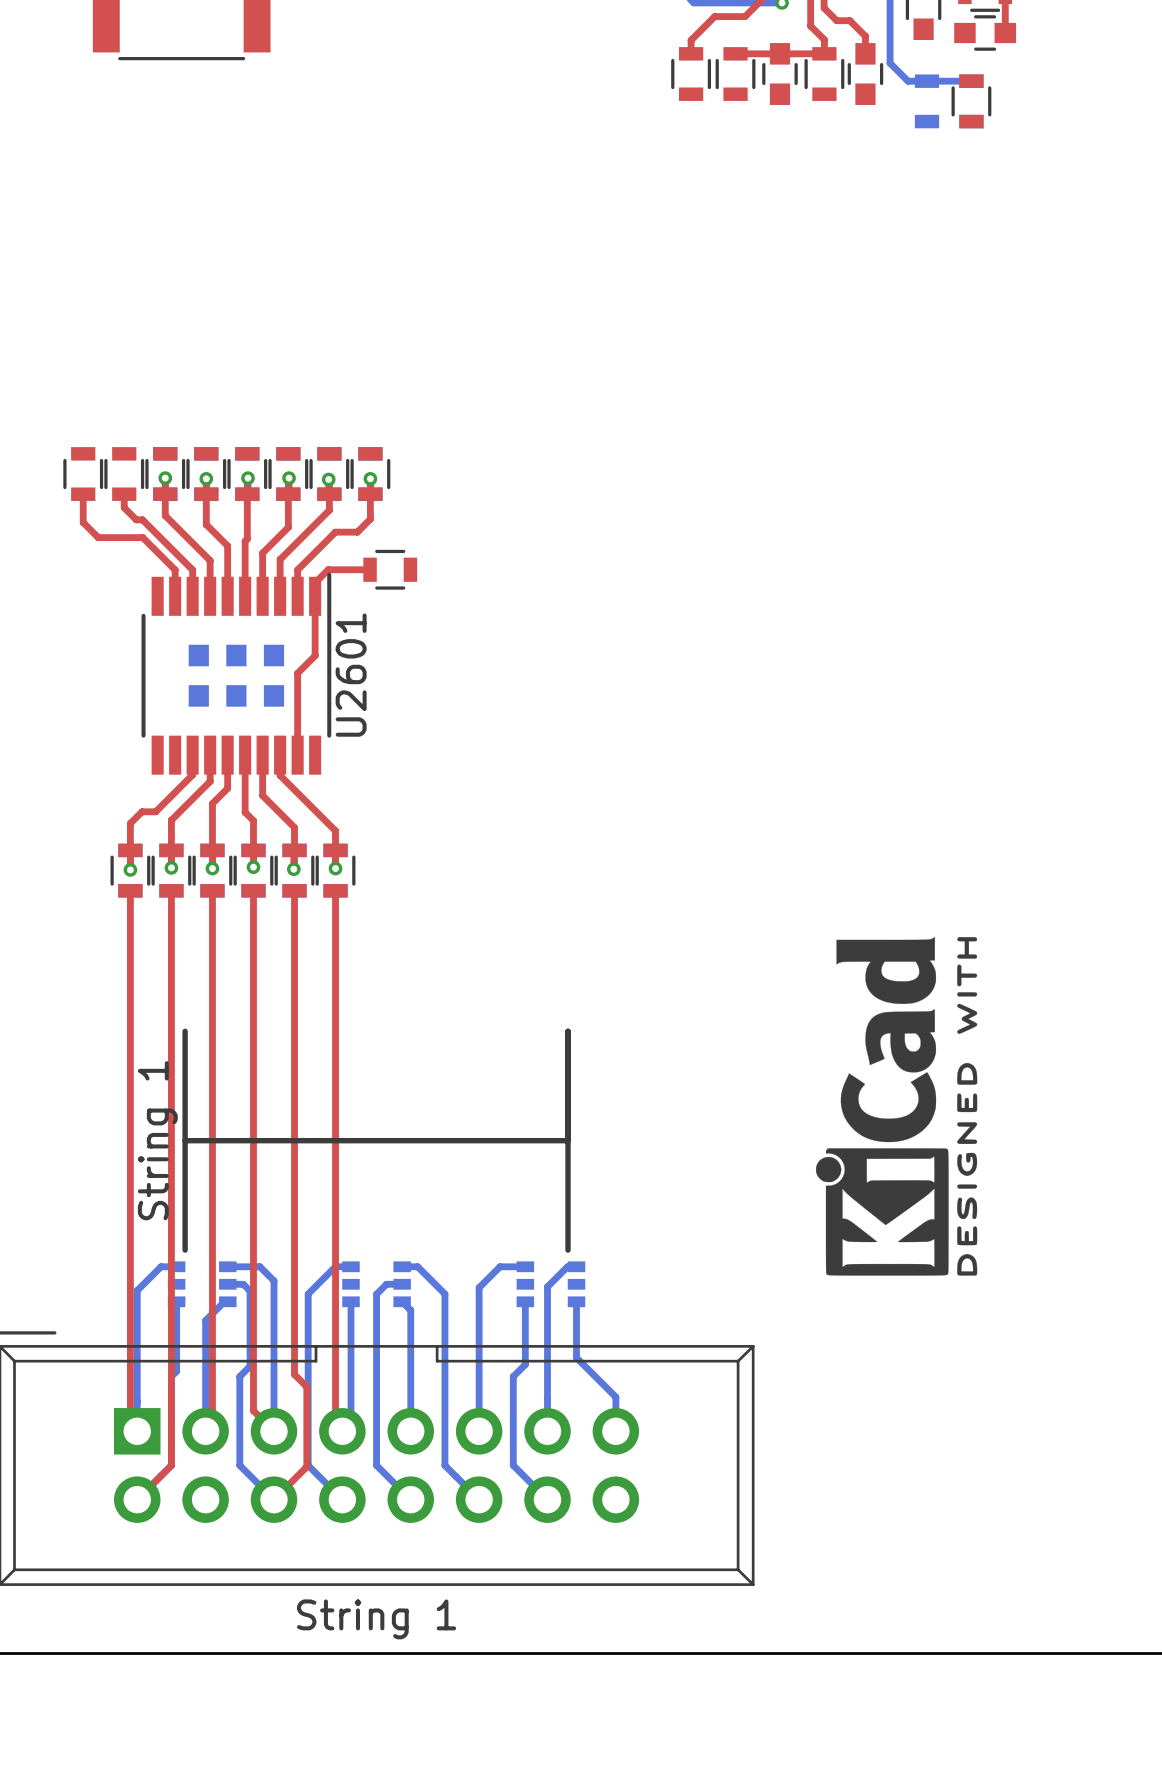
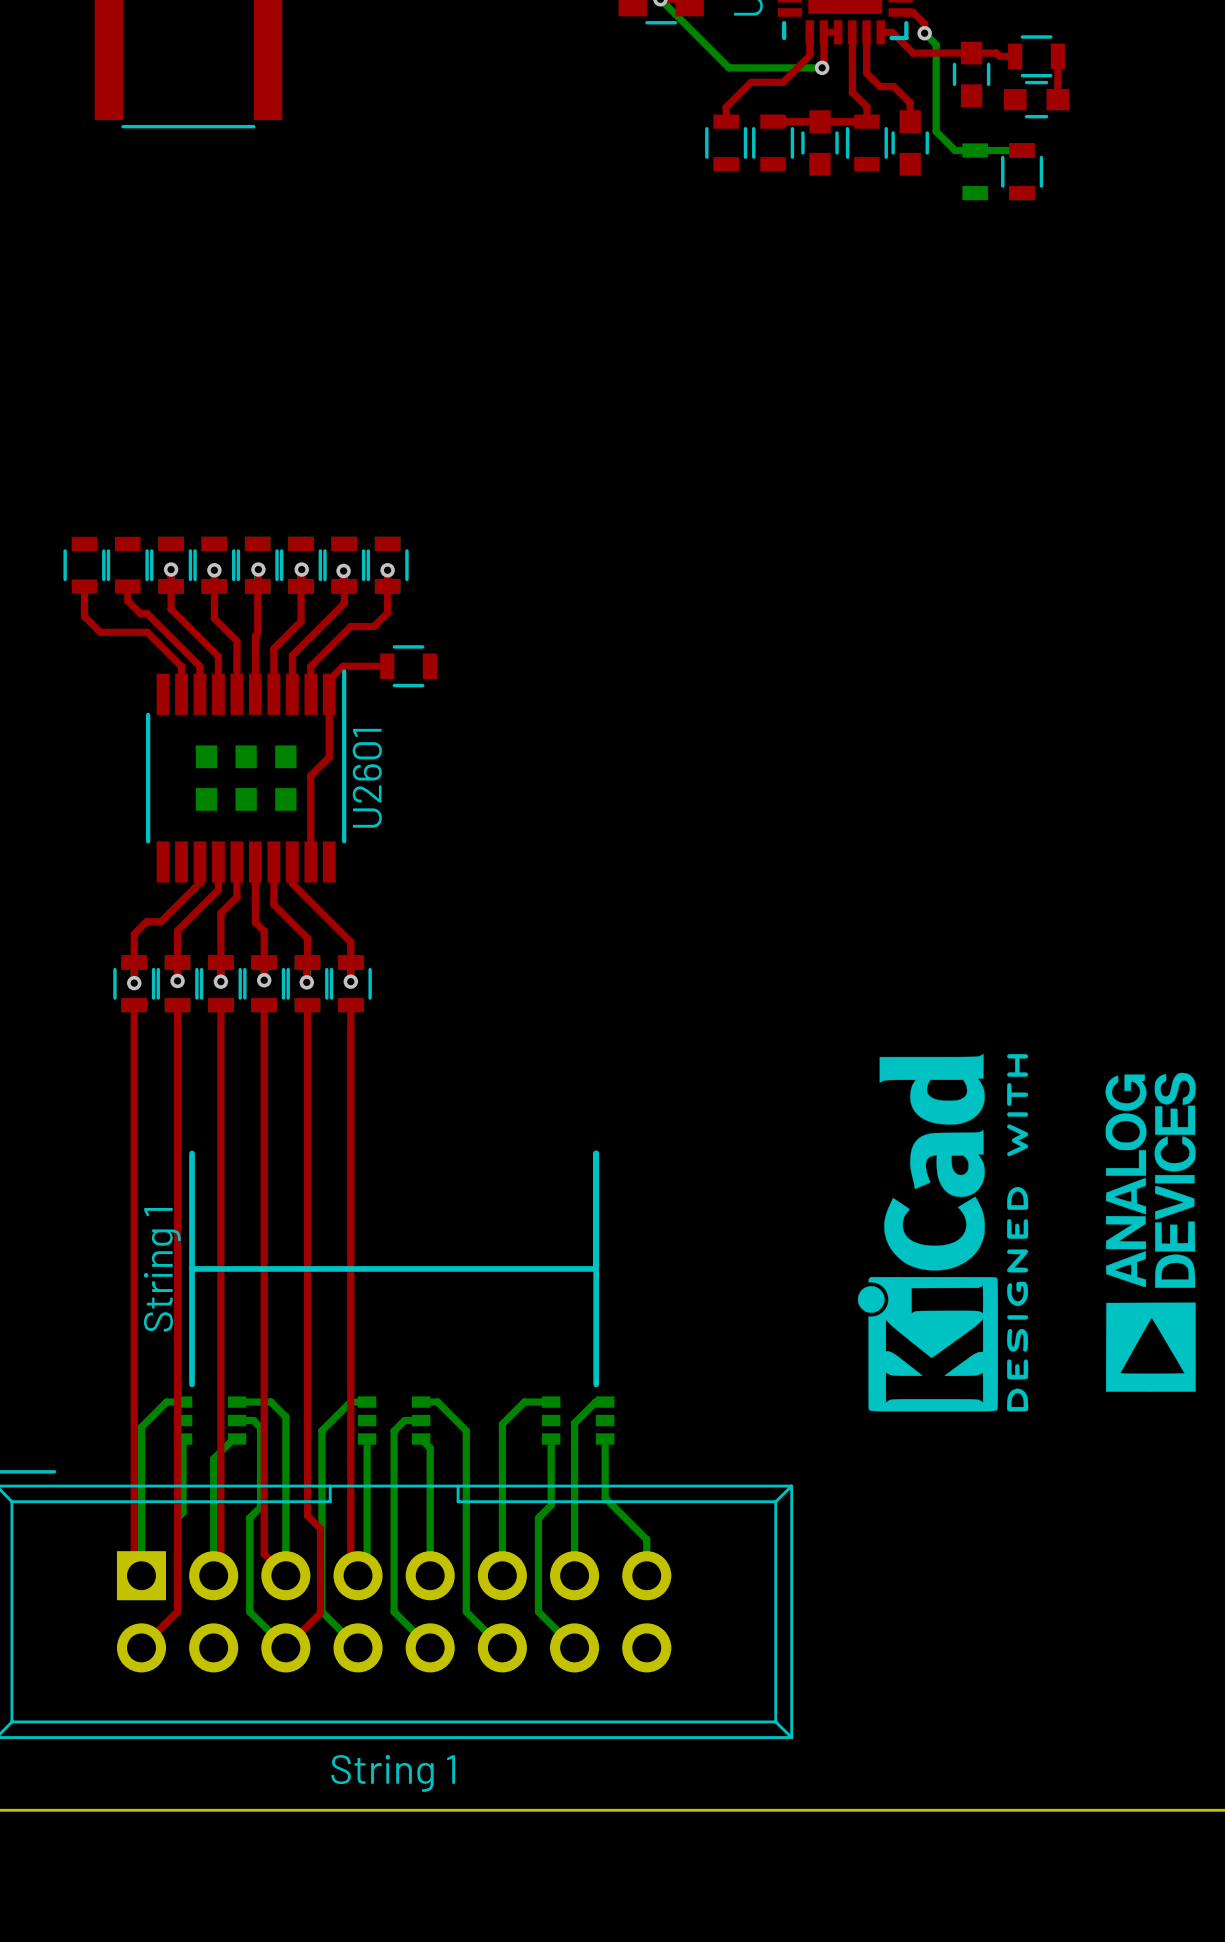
drawing: none -> [1105, 1072, 1196, 1392]

